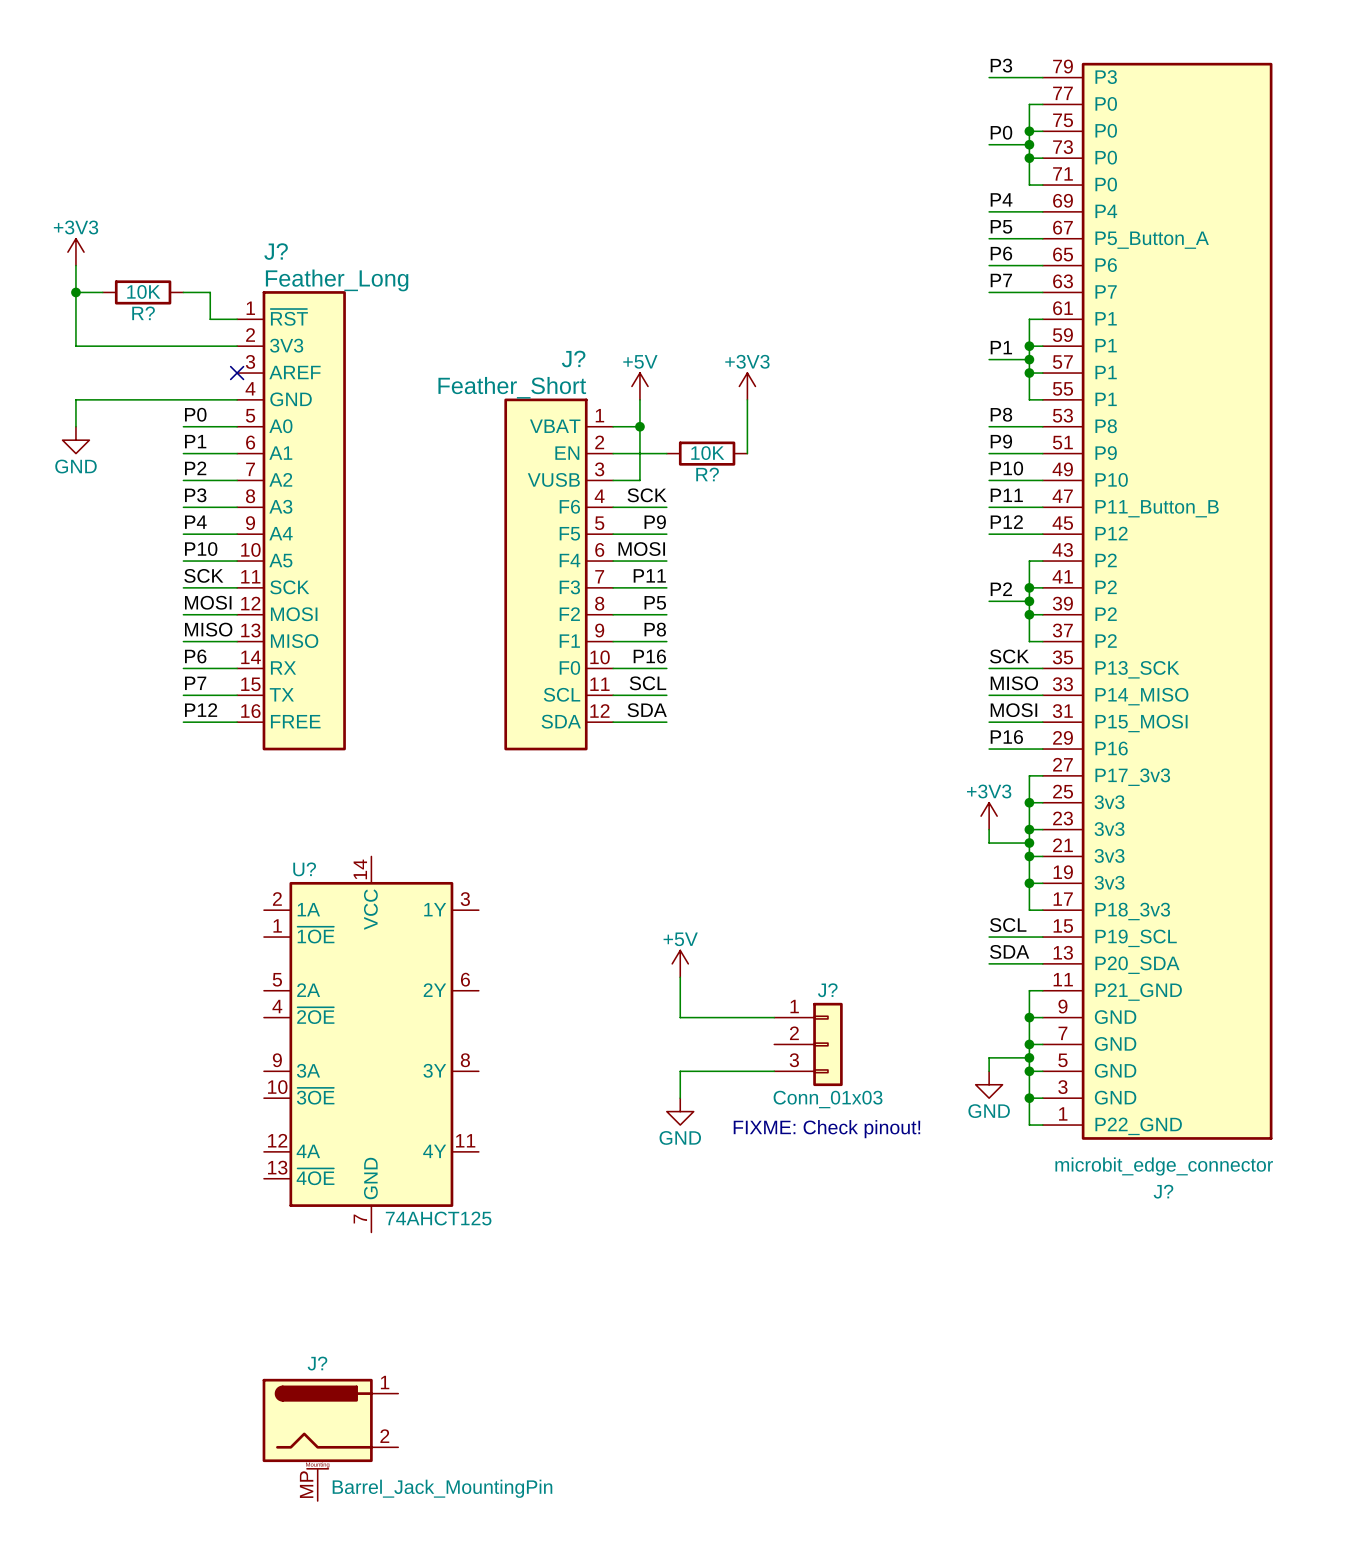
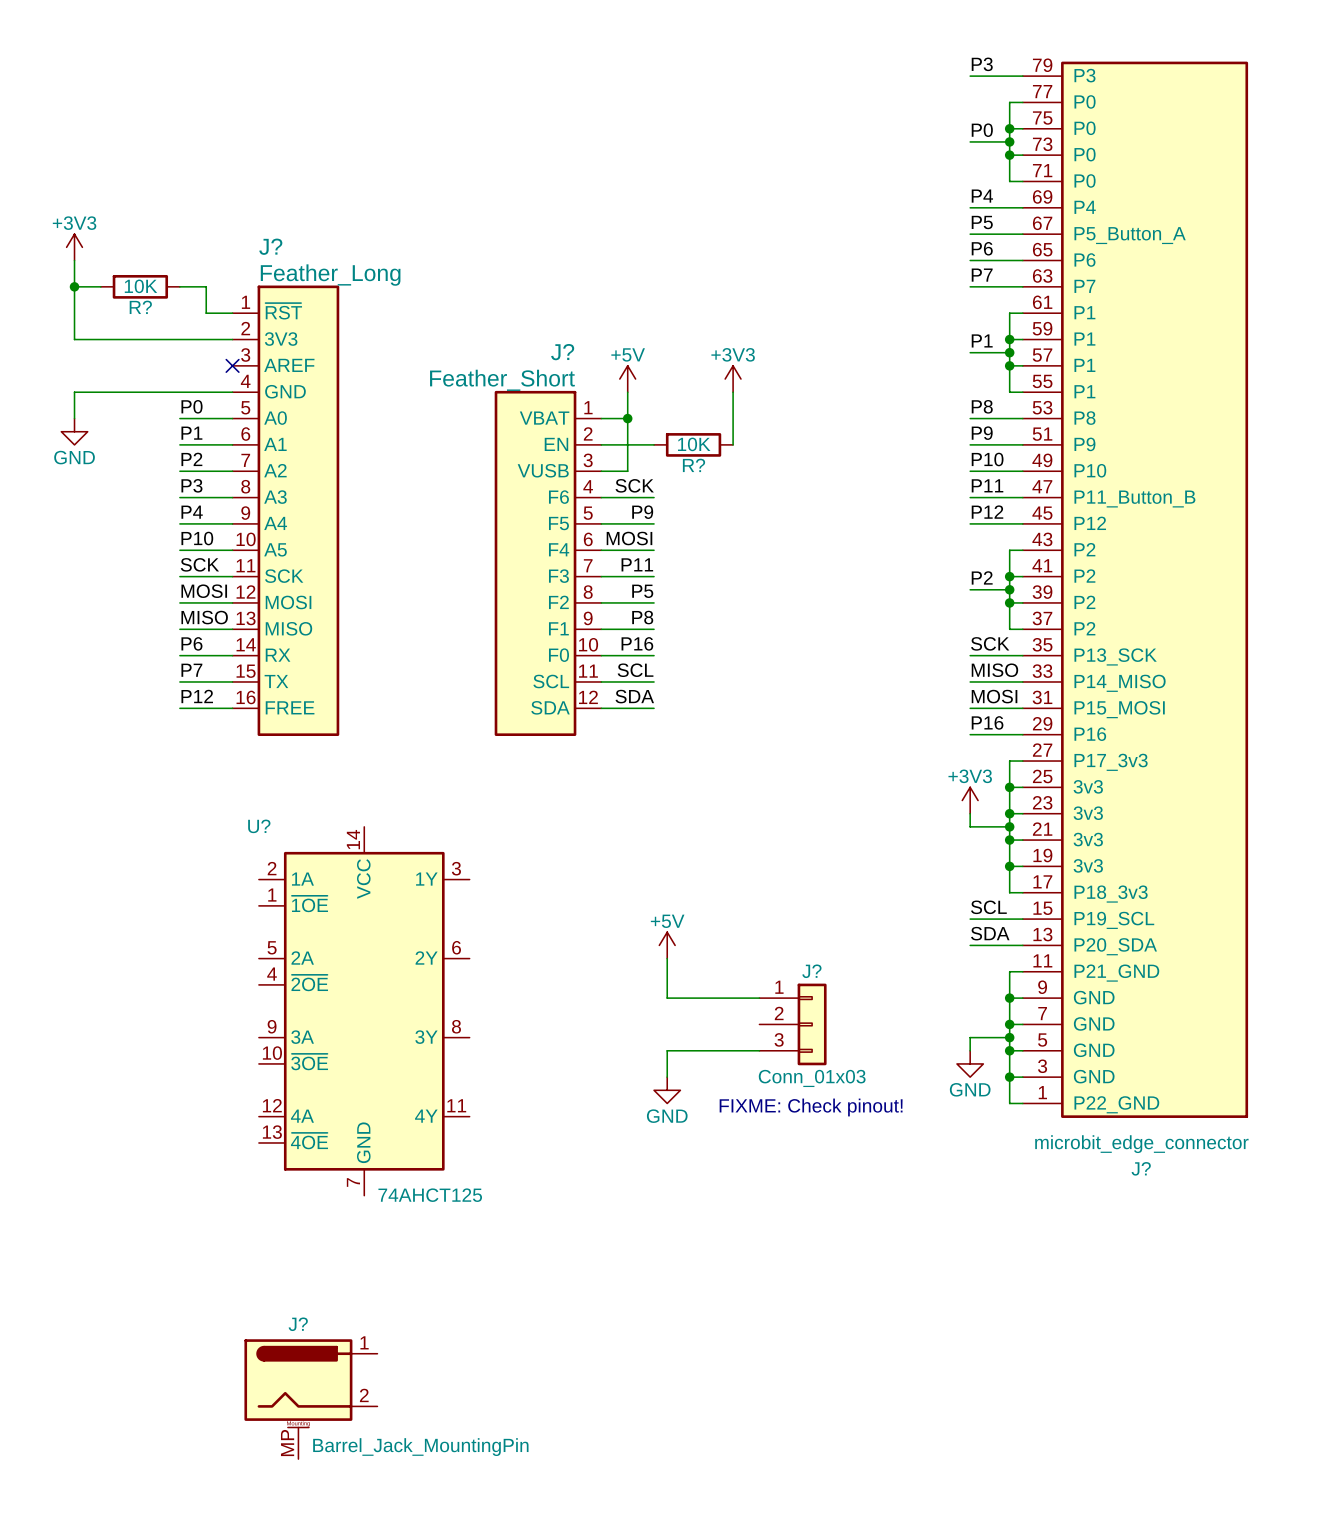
U? name position: U? (304, 869) -> U? (259, 826)
U? position: (371, 1044) -> (364, 1011)
J? position: (330, 1439) -> (310, 1399)

